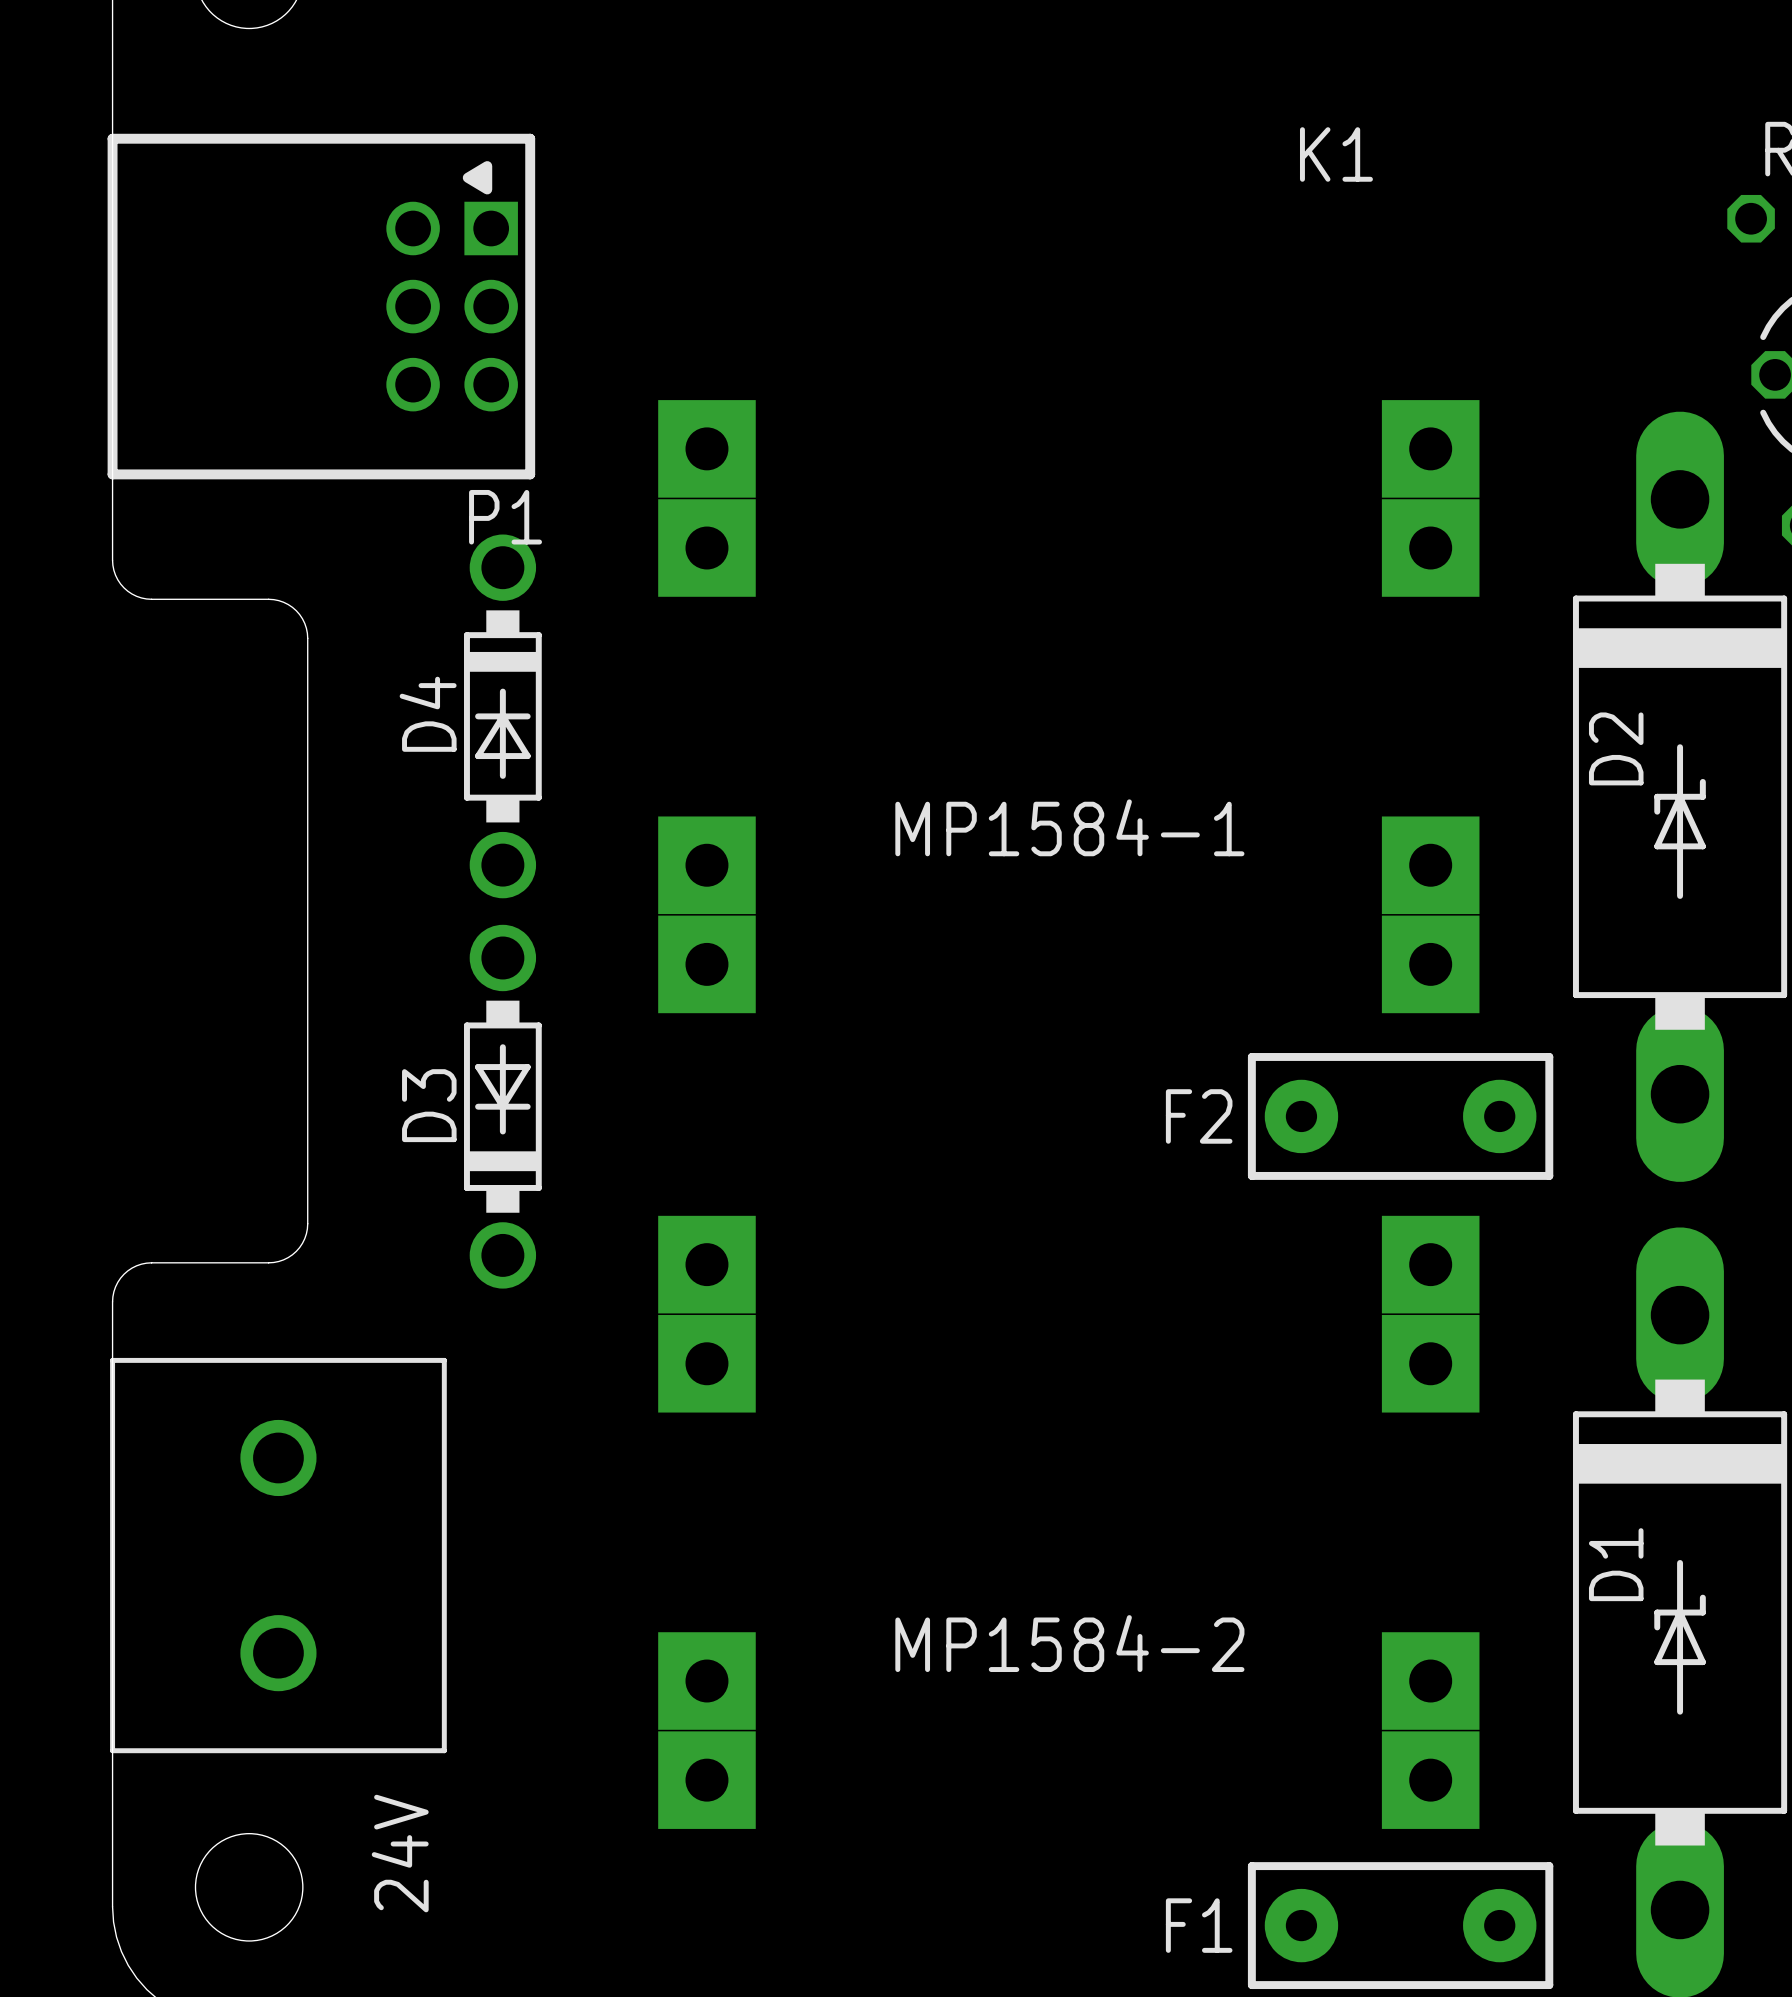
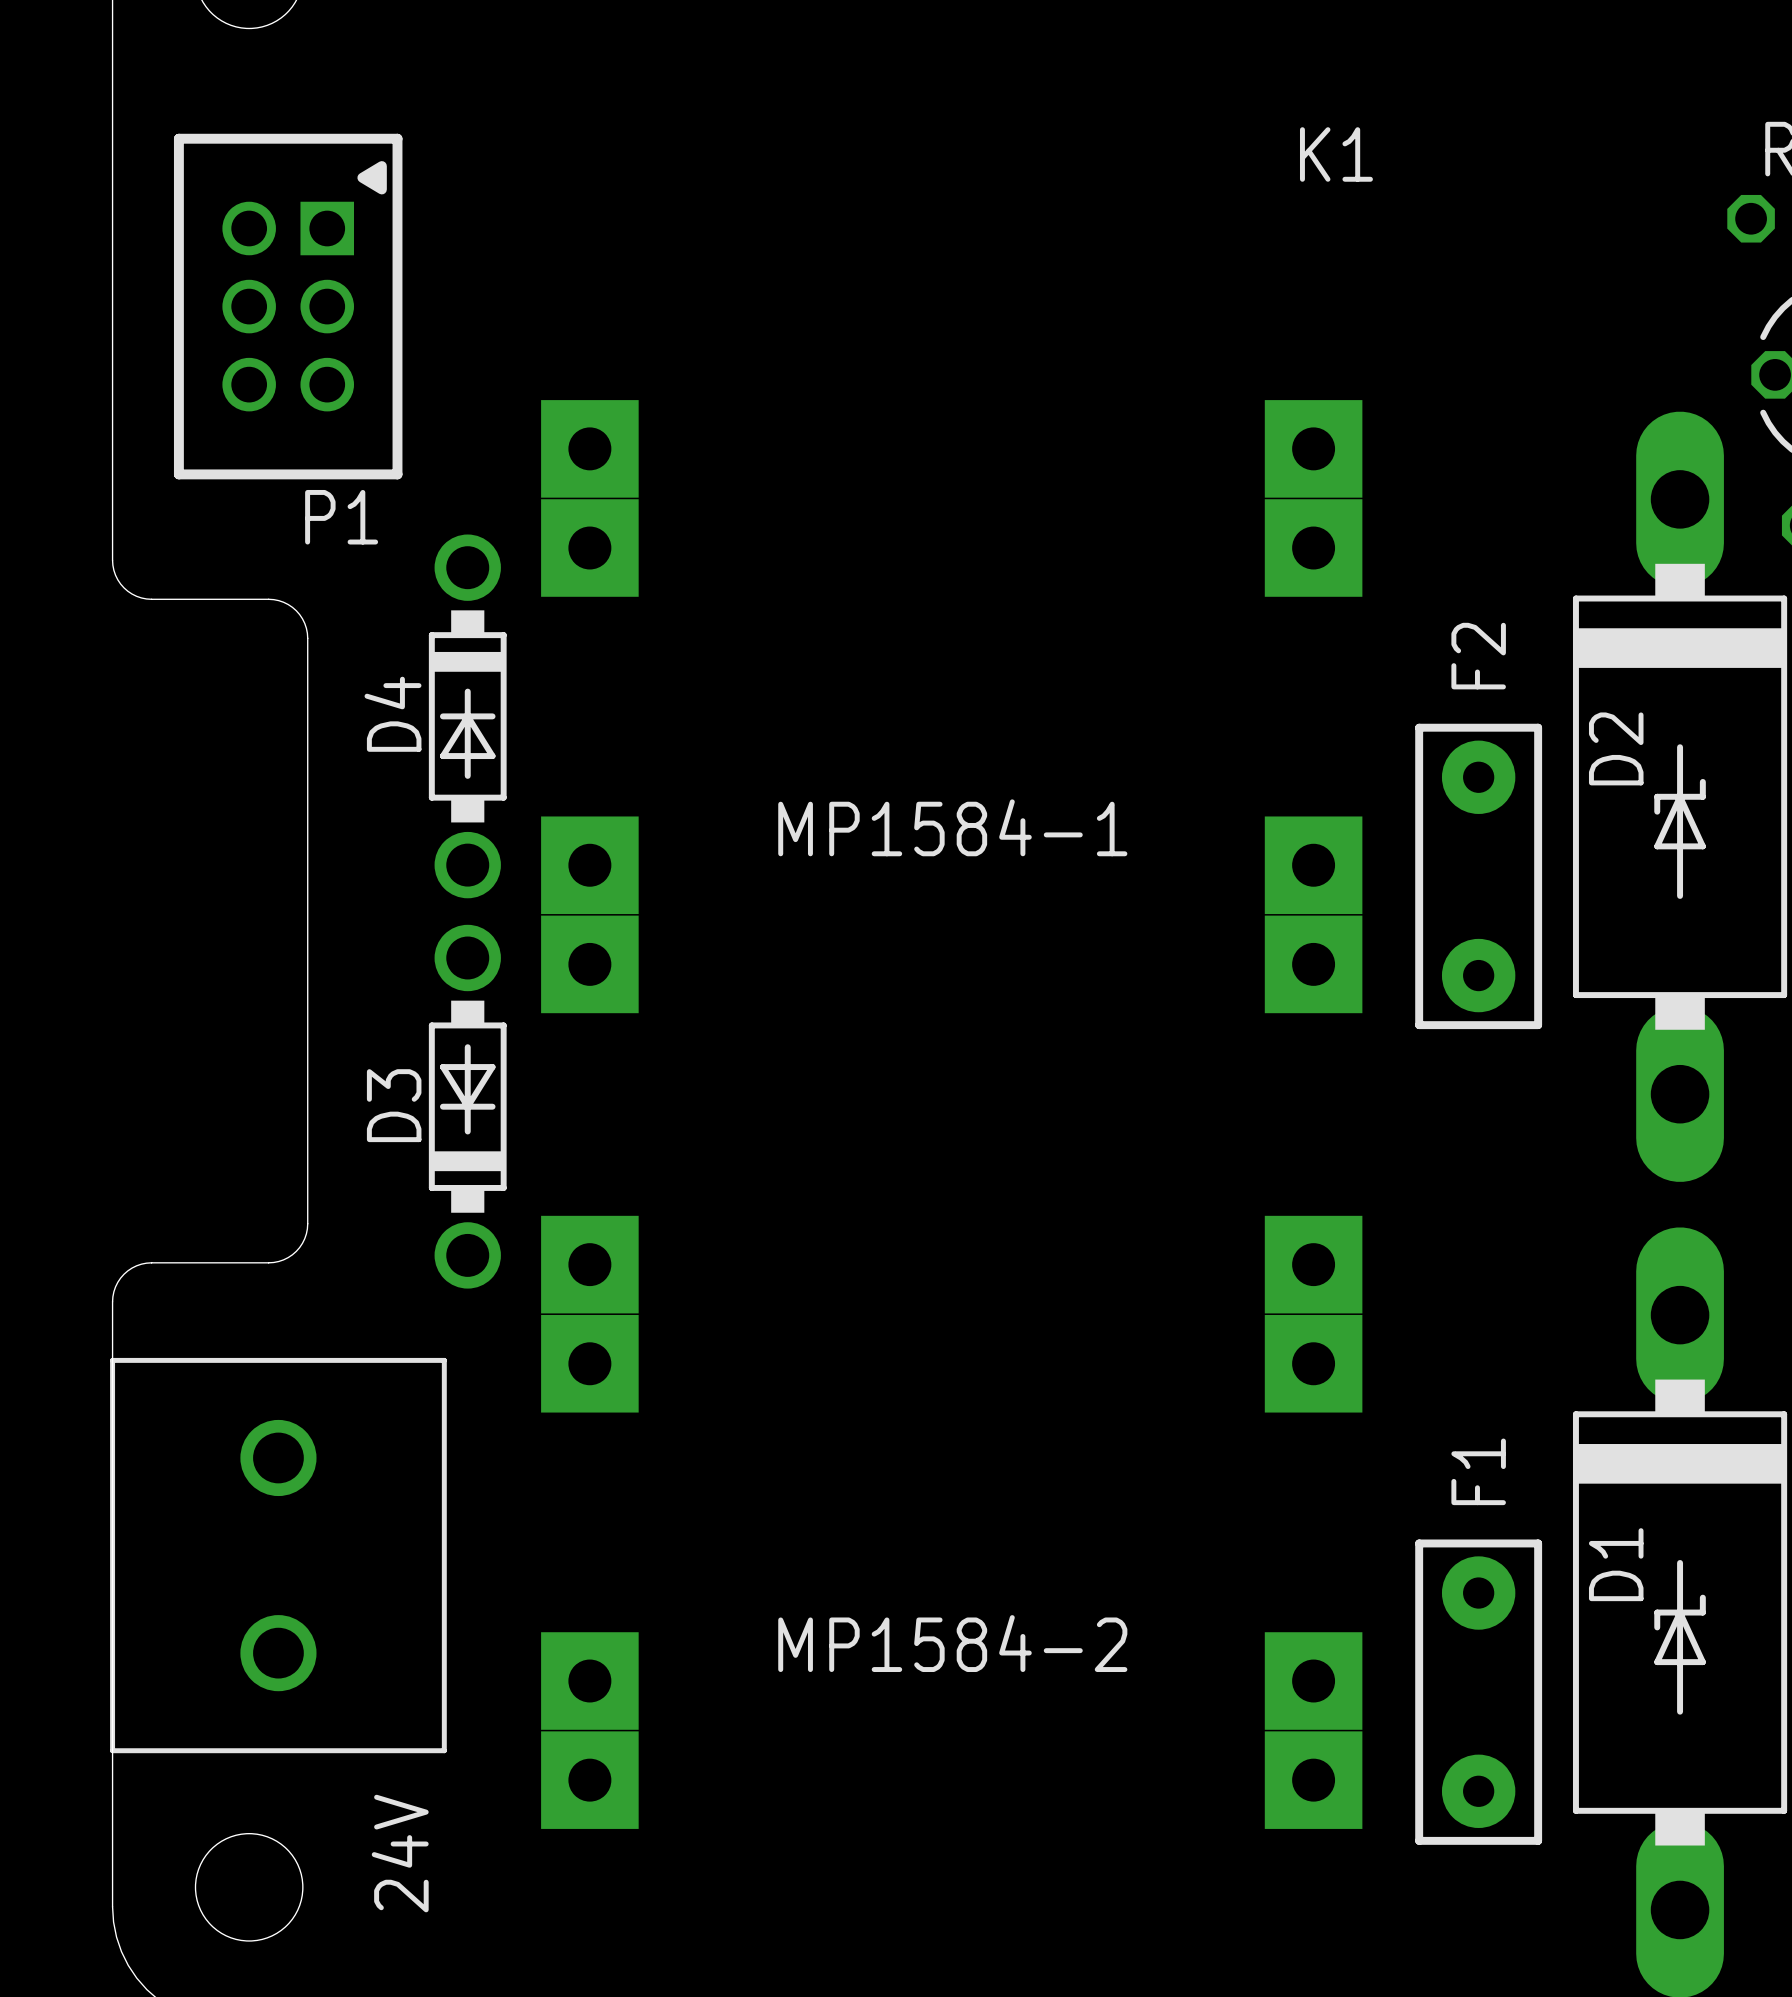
P1 footprint: [107, 133, 536, 480] -> [173, 133, 403, 480]
P1 name position: P1 (505, 517) -> P1 (341, 517)
MP1584-1 position: (1068, 706) -> (951, 706)
D4 position: (502, 716) -> (467, 716)
D3 position: (502, 1106) -> (467, 1106)
F2 rotation: 0° (1400, 1116) -> 90° clockwise (1478, 876)
F2 position: (1400, 1116) -> (1478, 876)
MP1584-2 position: (1068, 1522) -> (951, 1522)
F1 rotation: 0° (1400, 1925) -> 90° clockwise (1478, 1692)
F1 position: (1400, 1925) -> (1478, 1692)

